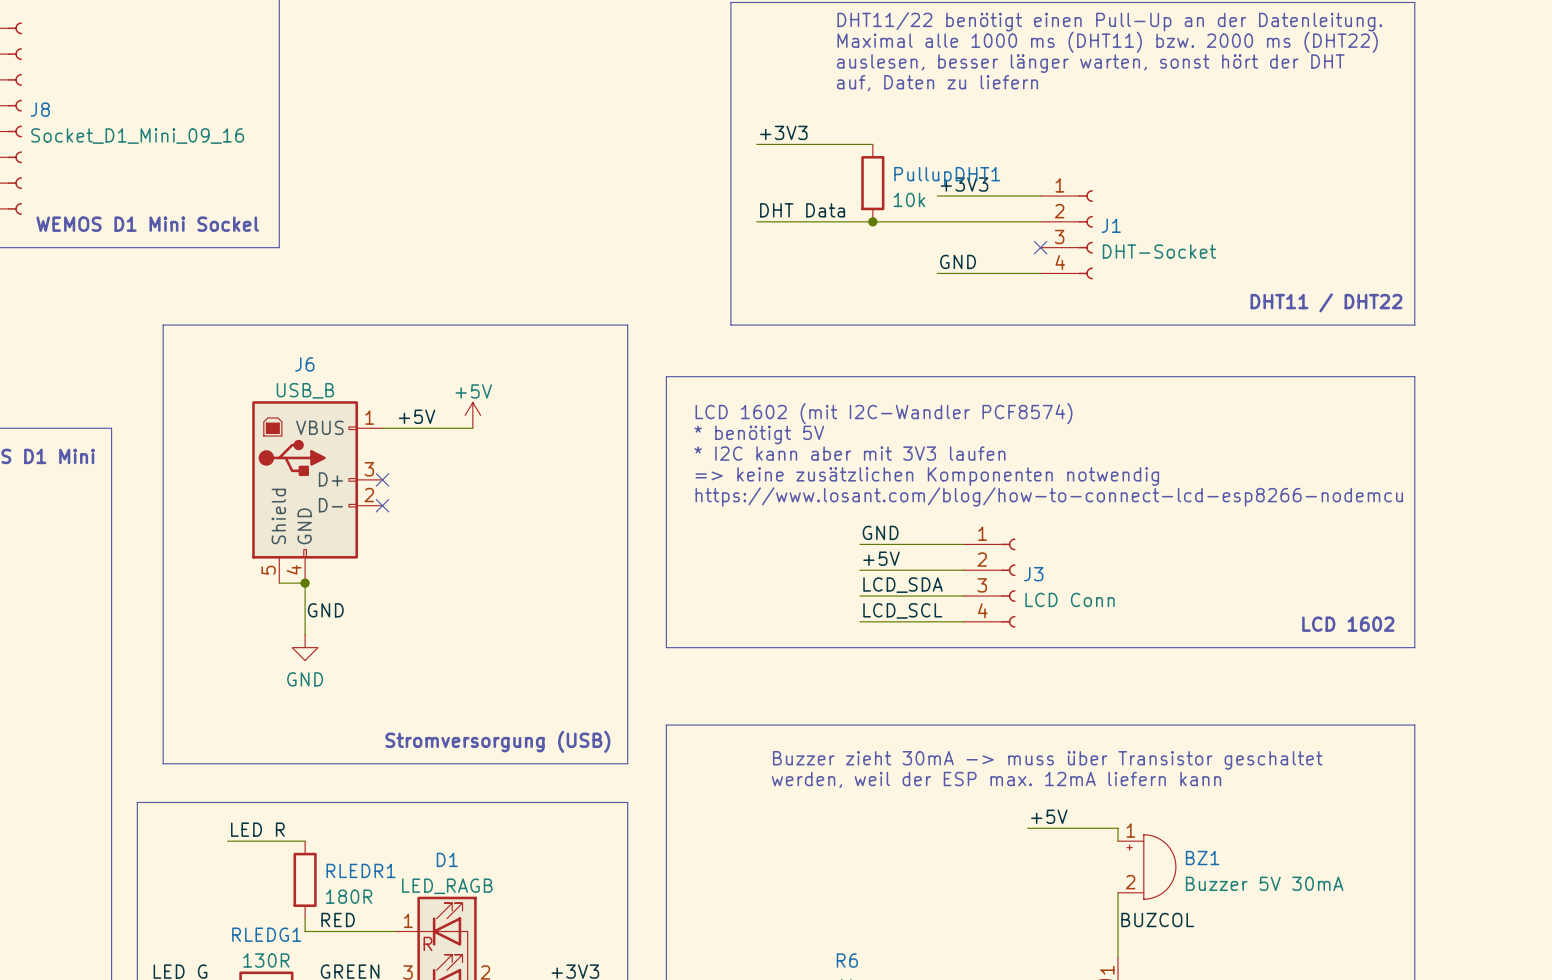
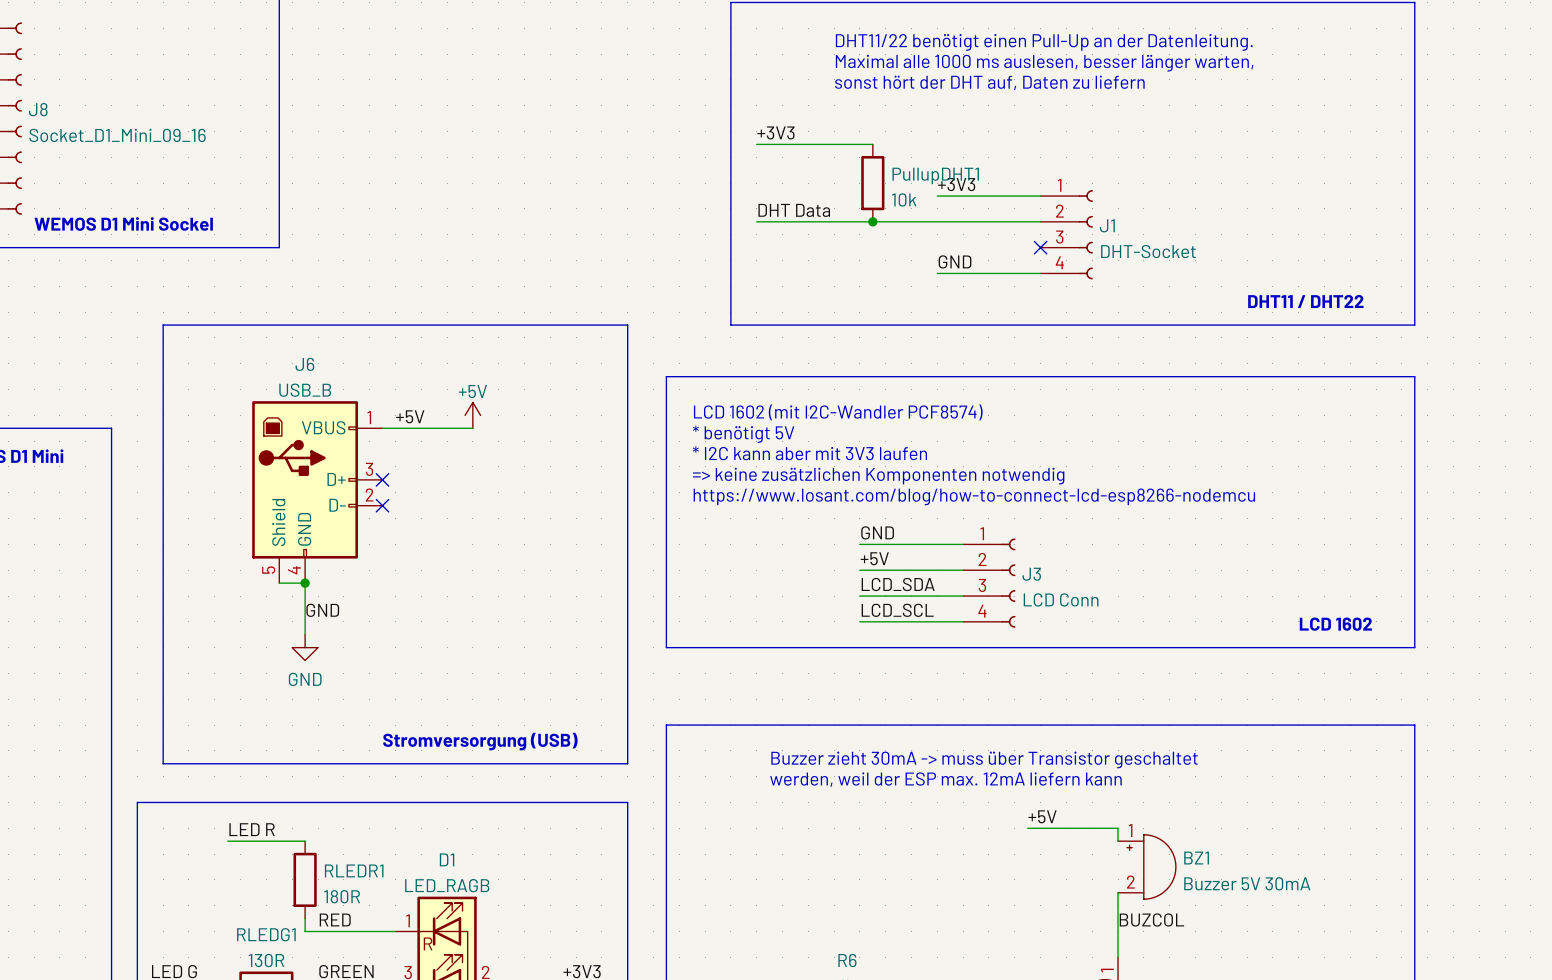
text: DHT11/22 benötigt einen Pull-Up an der Datenleitung. (1109, 21) -> none
text: Maximal alle 1000 ms (DHT11) bzw. 2000 ms (DHT22) (1107, 42) -> DHT11/22 benötigt einen Pull-Up an der Datenleitung. (1044, 42)
text: auslesen, besser länger warten, sonst hört der DHT (1090, 63) -> Maximal alle 1000 ms auslesen, besser länger warten, (1044, 63)
text: auf, Daten zu liefern (937, 83) -> sonst hört der DHT auf, Daten zu liefern (989, 82)

